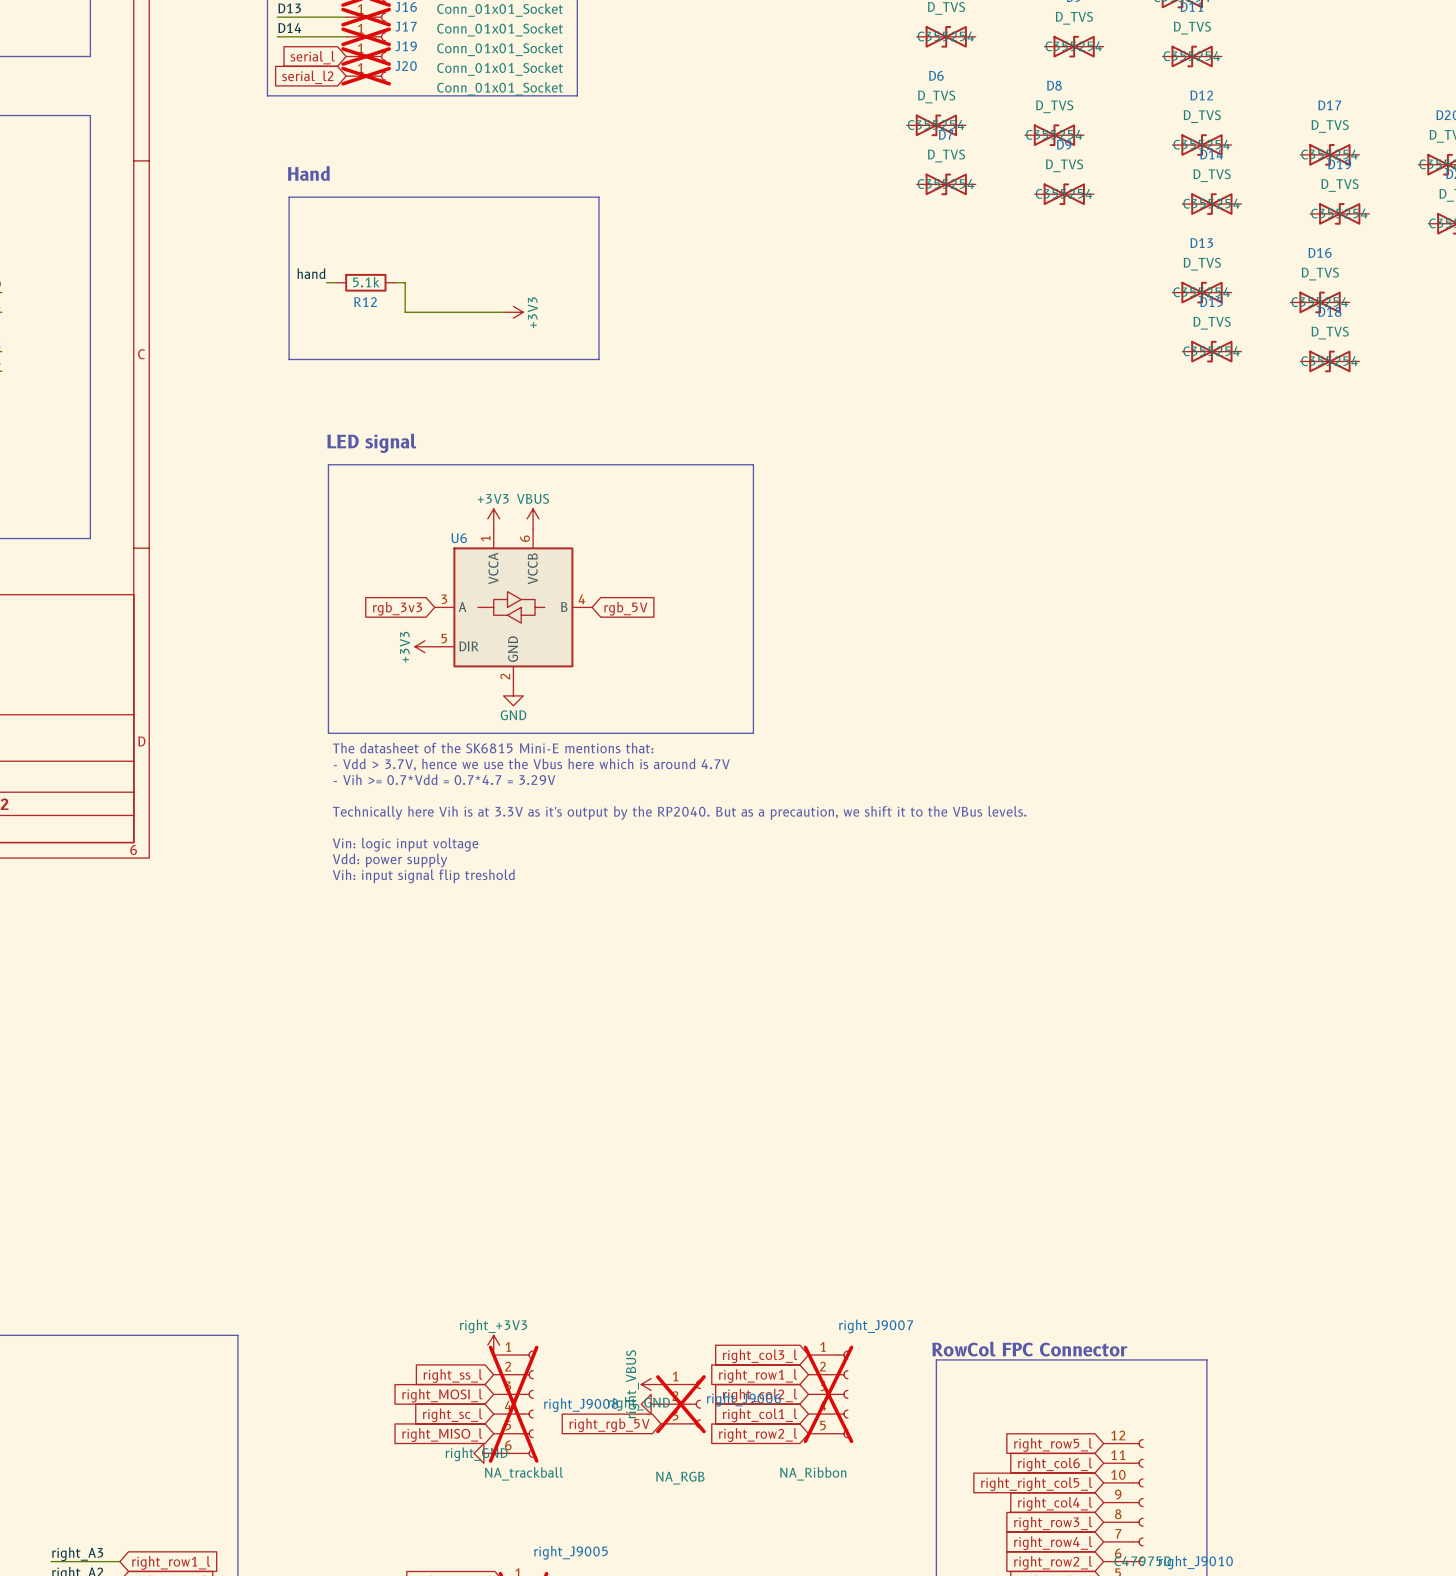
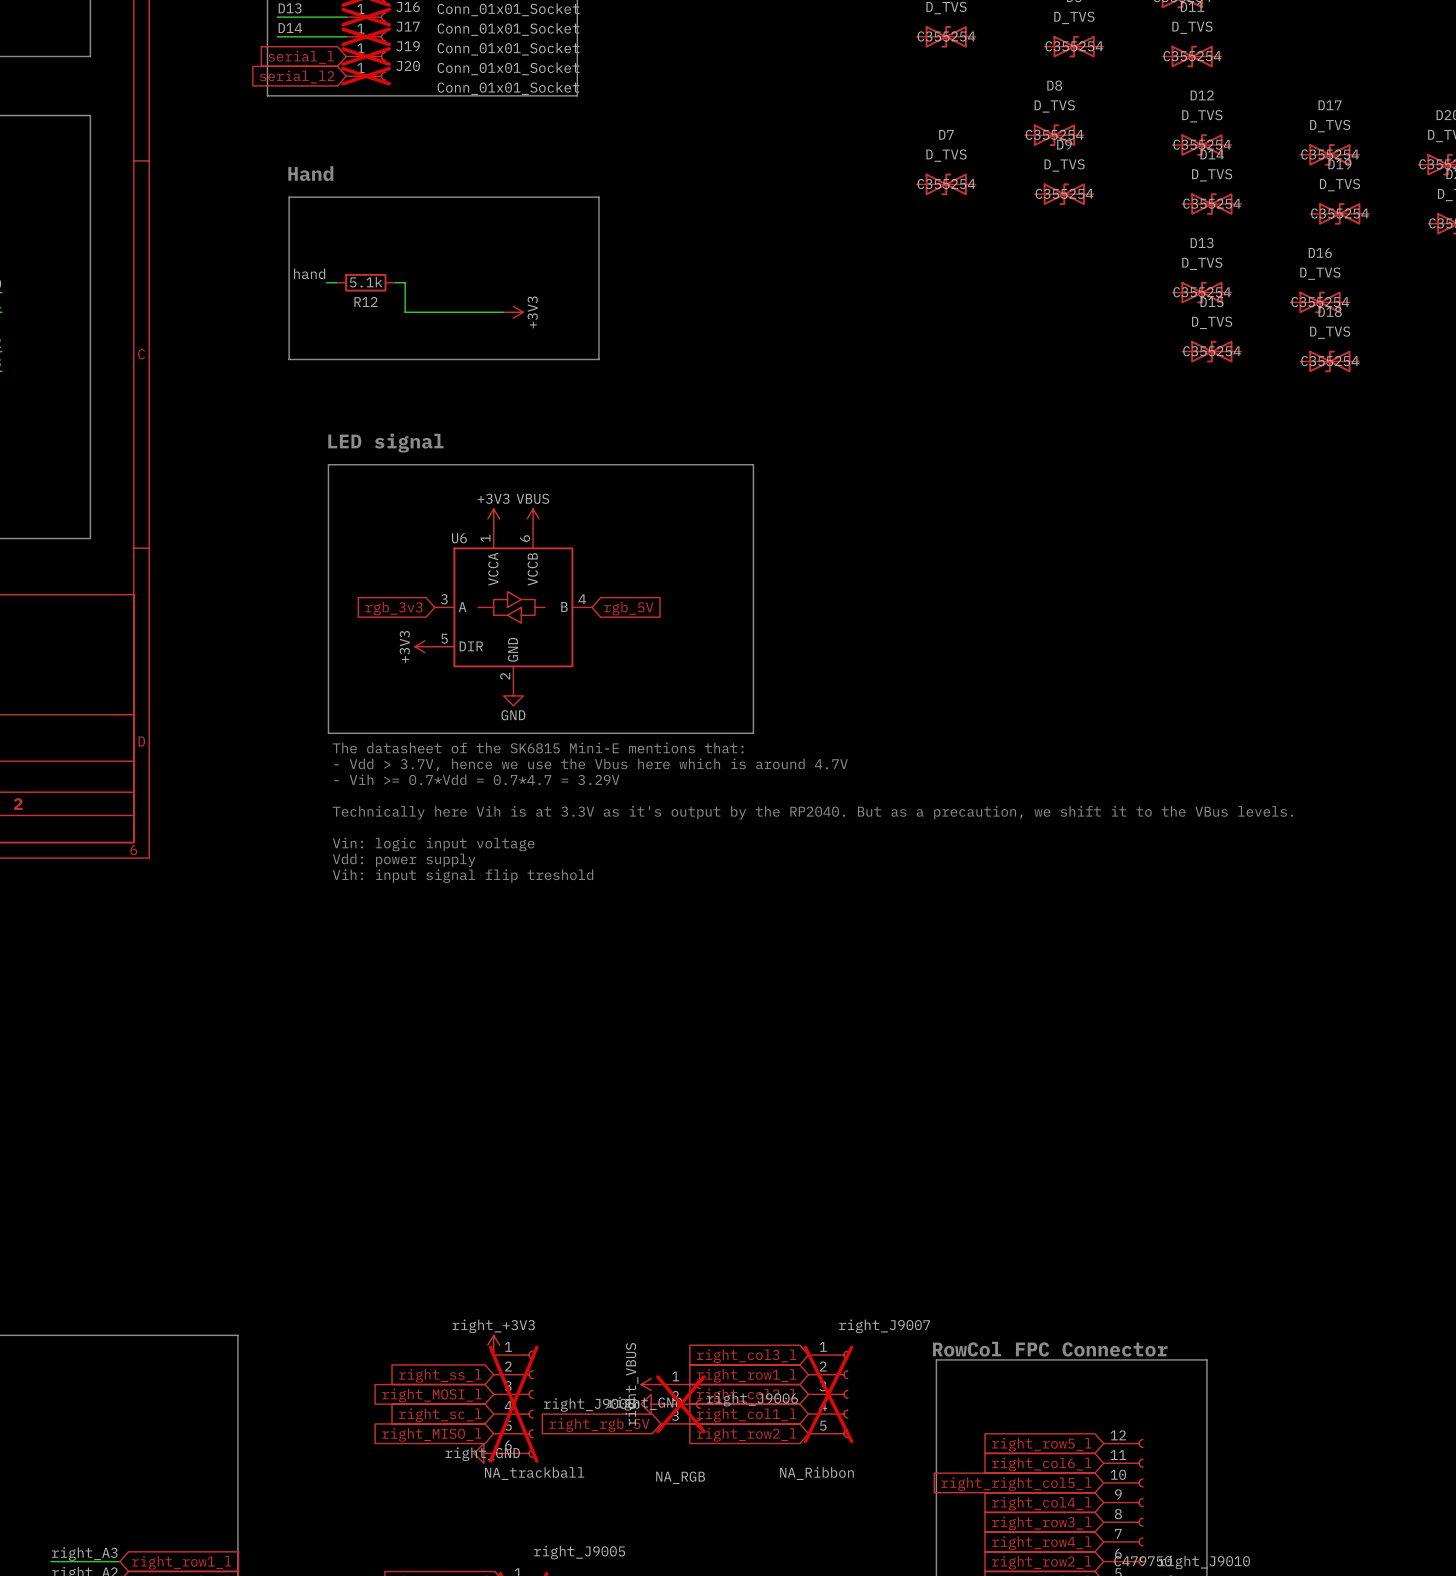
D6: D_TVS (936, 125) -> none

